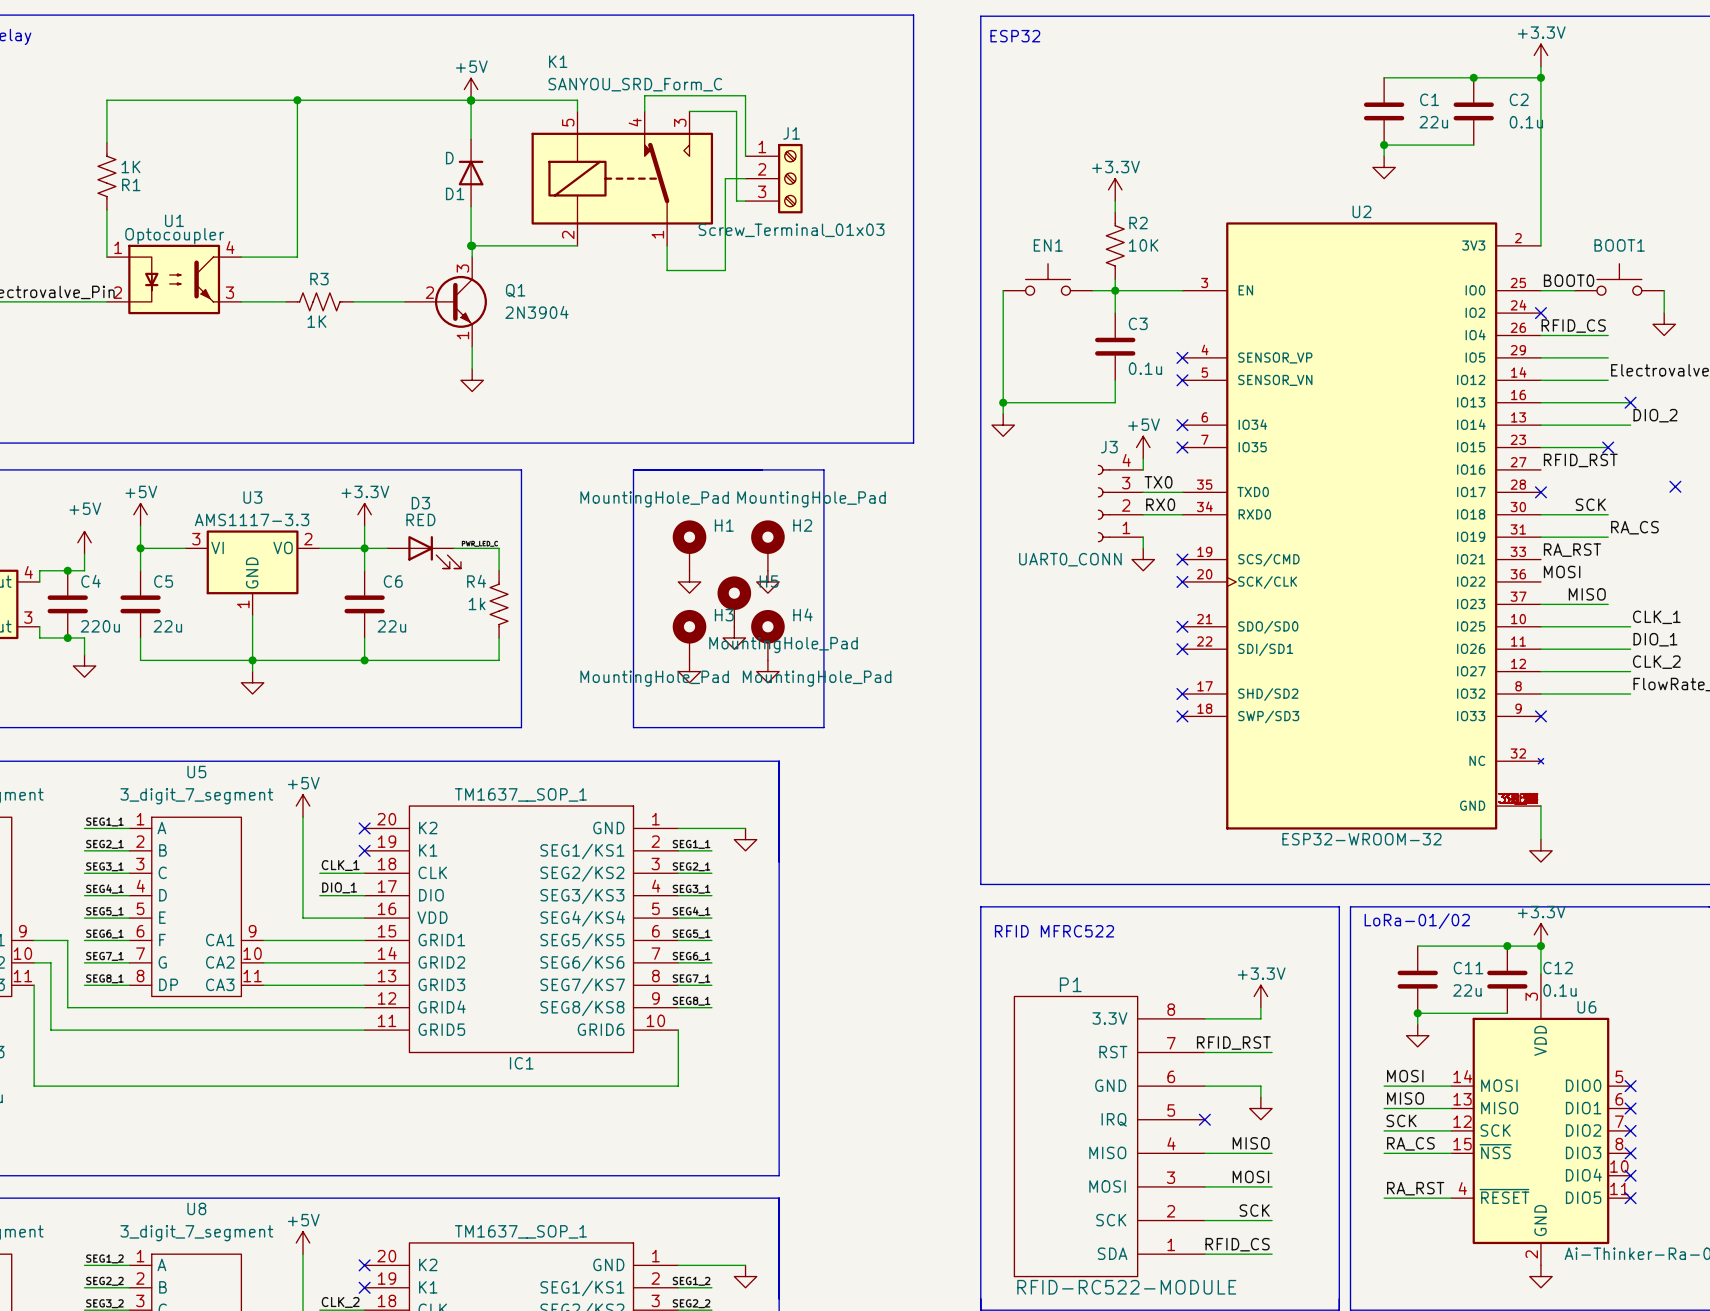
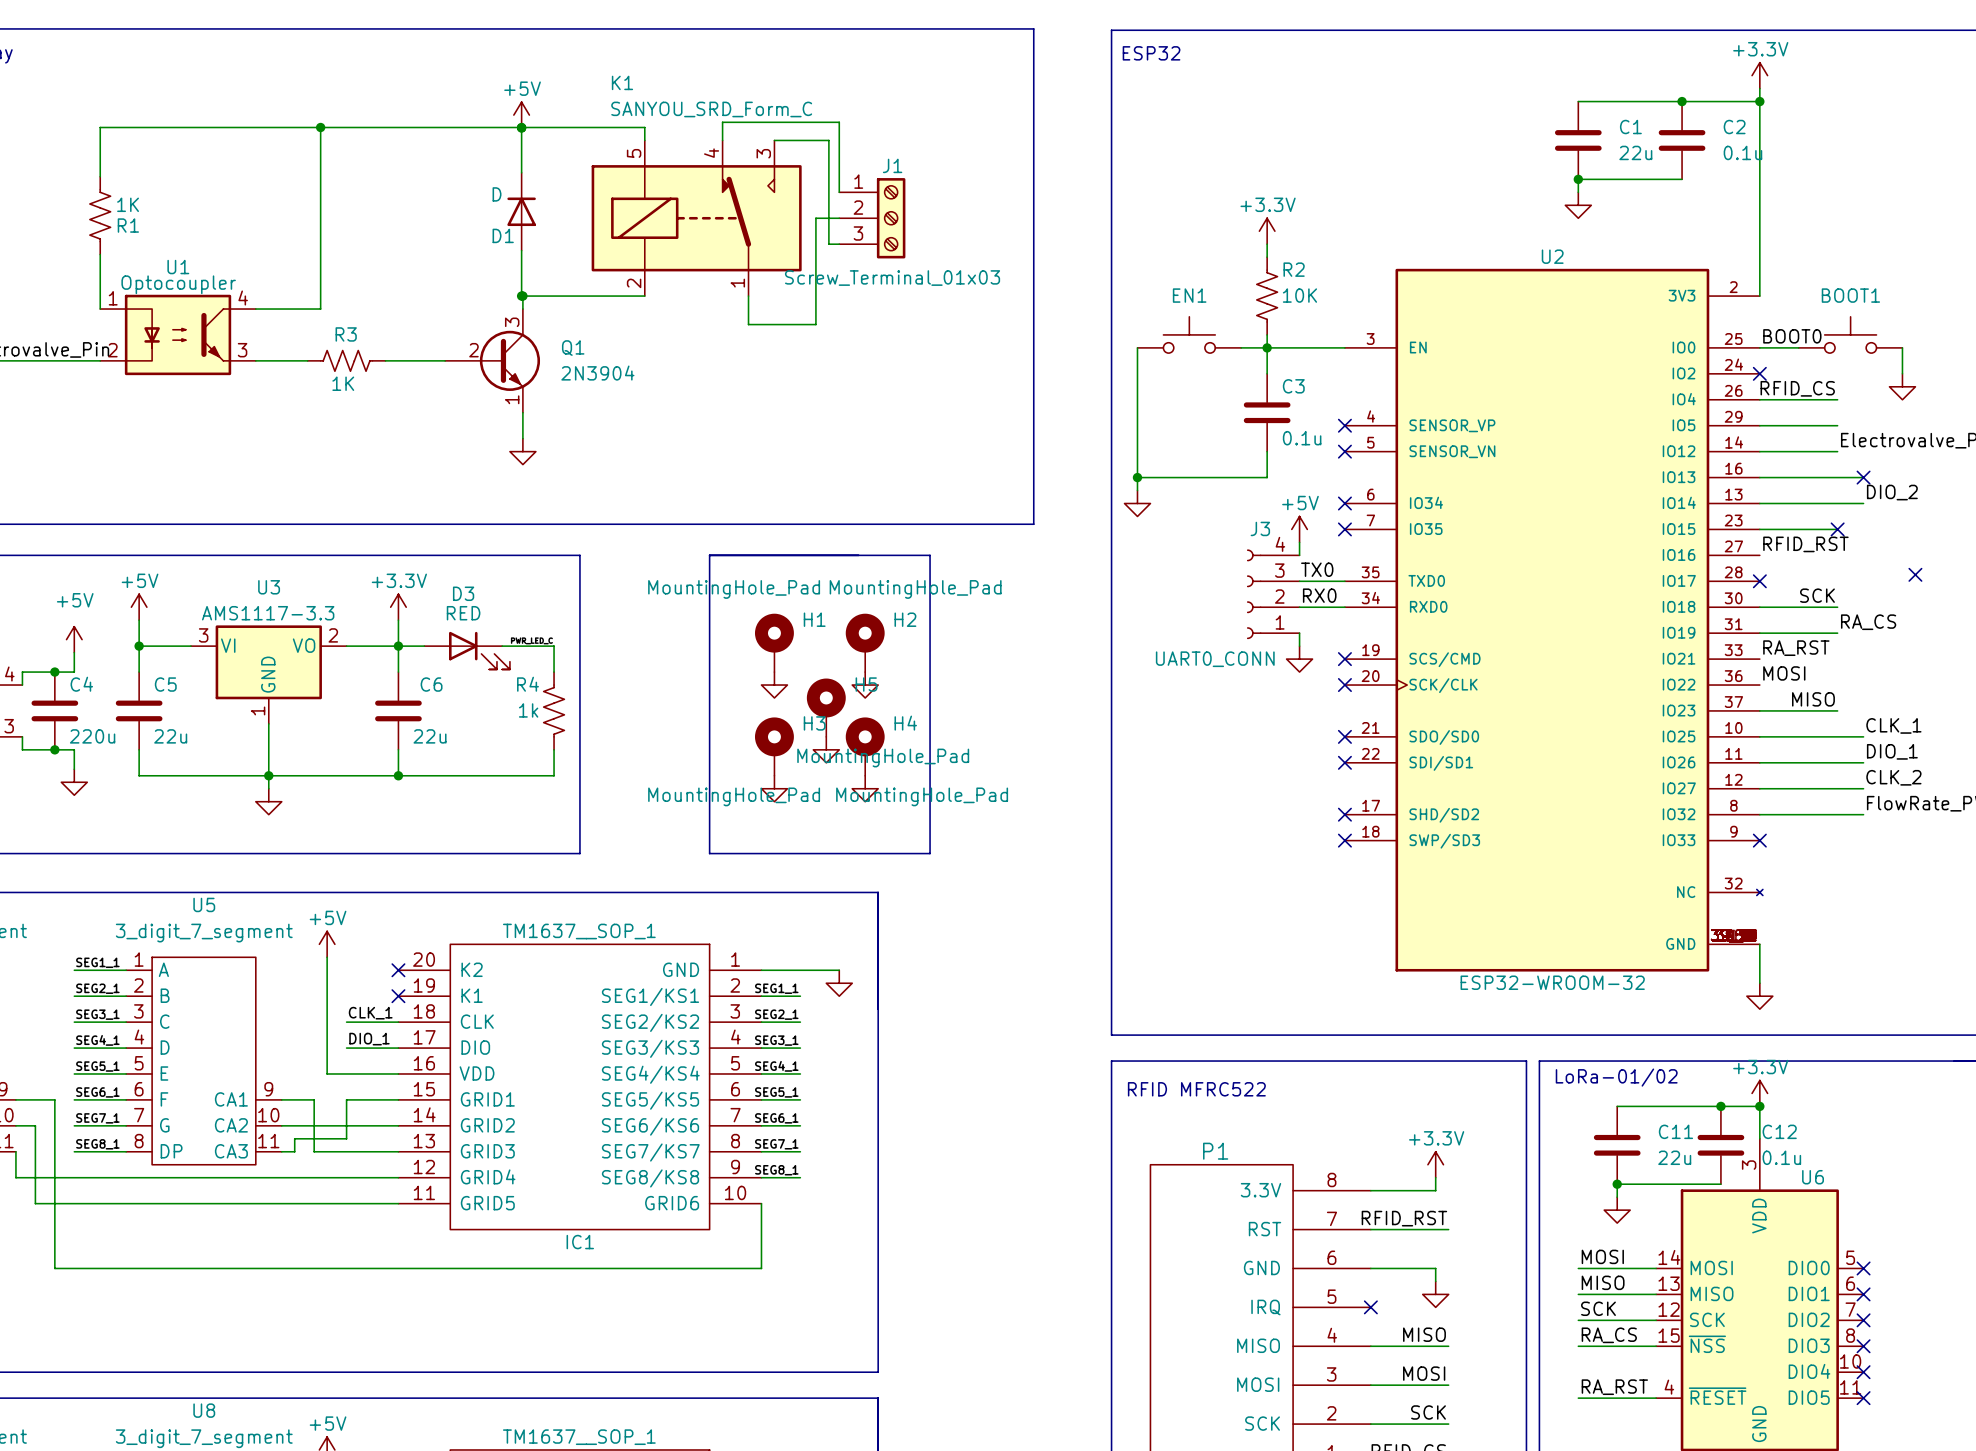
wire: (291, 940) (319, 940) -> (294, 1151) (294, 1138) (346, 1138) (346, 1099)
wire: (274, 985) (291, 985) -> (314, 1099) (314, 1151)
wire: (34, 1007) (34, 1086) (67, 1086) -> (15, 1177) (54, 1177) (54, 1268)

